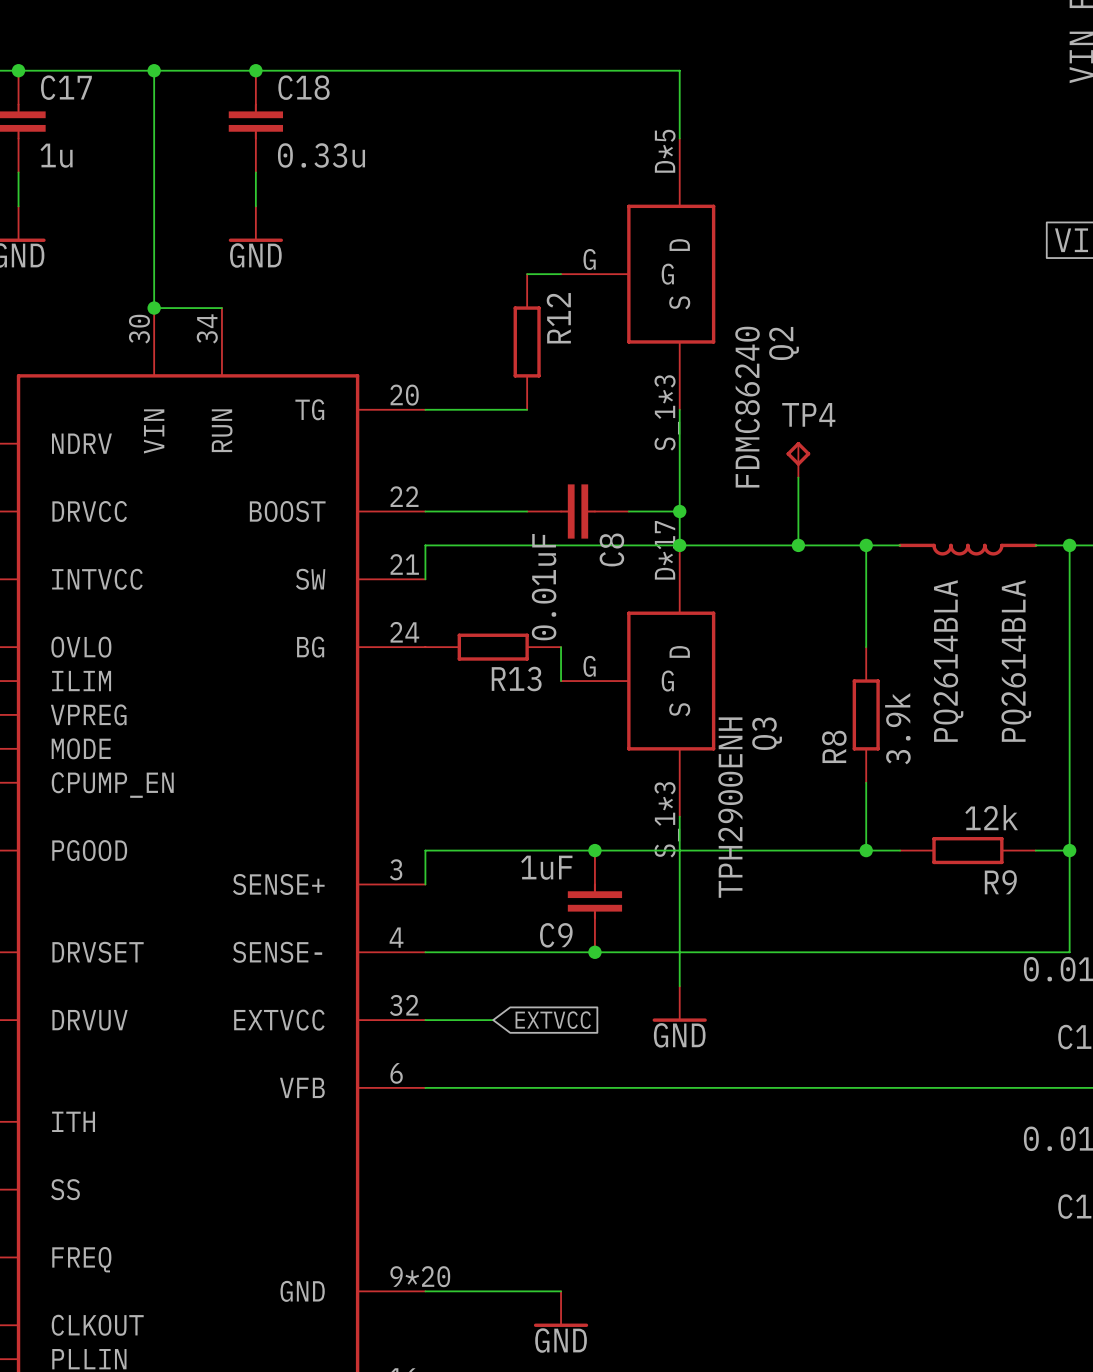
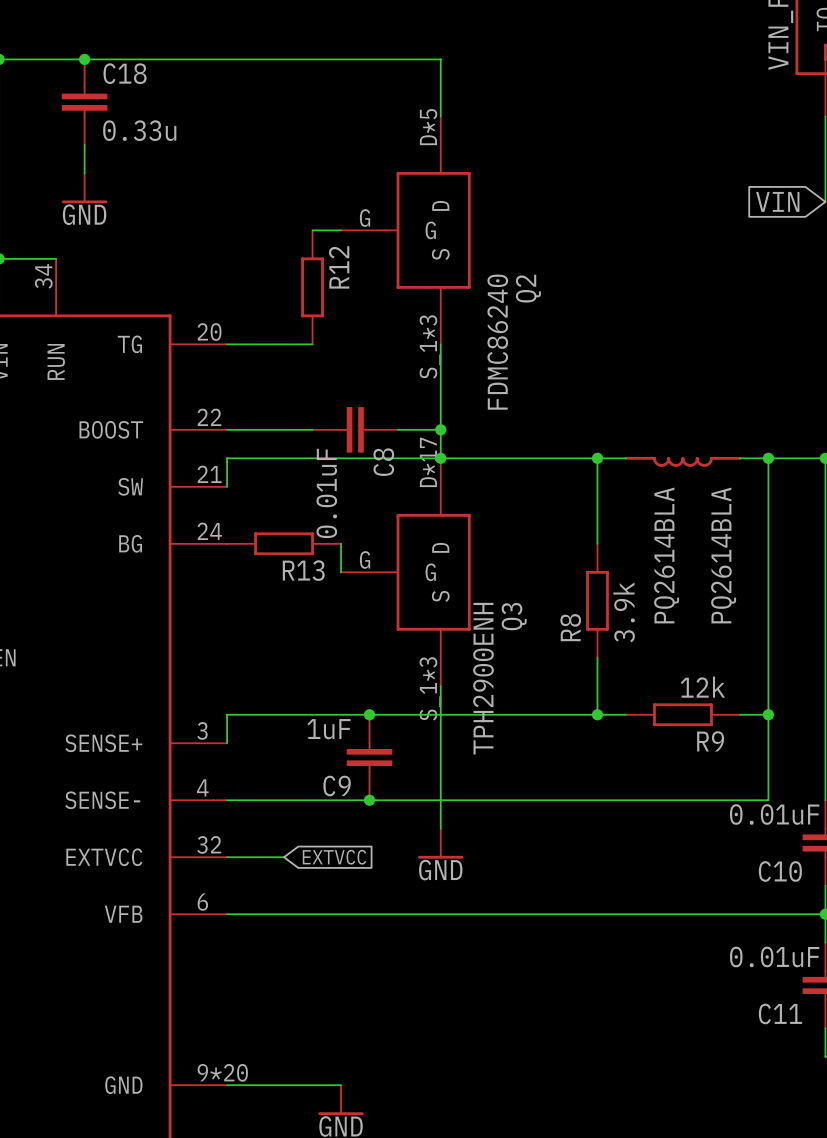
TP4: (798, 459) -> none
wire: (798, 477) (798, 545) -> none
junction: (798, 545) -> none

